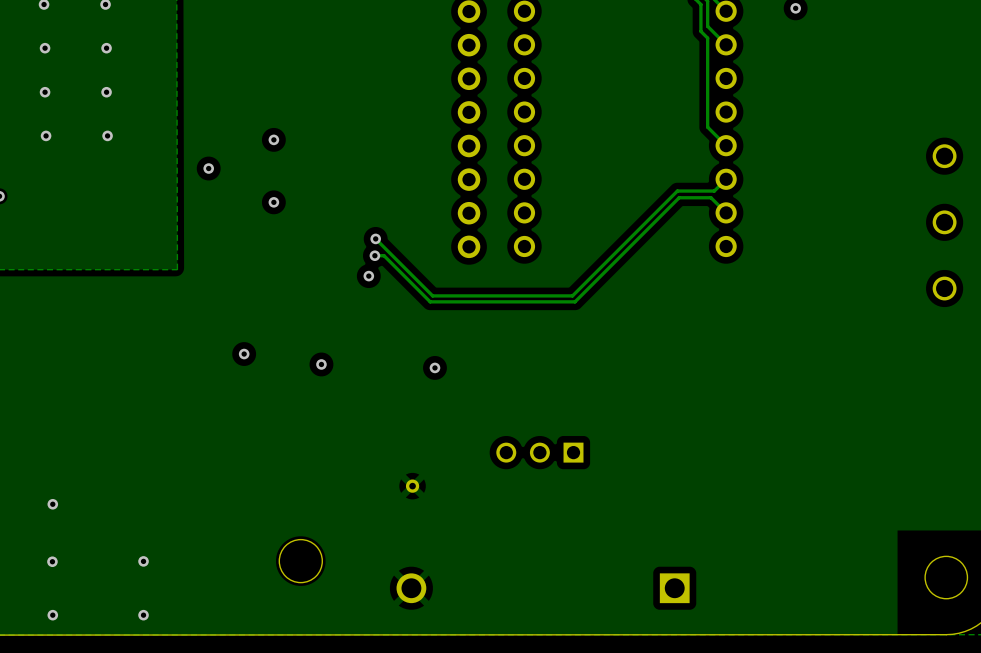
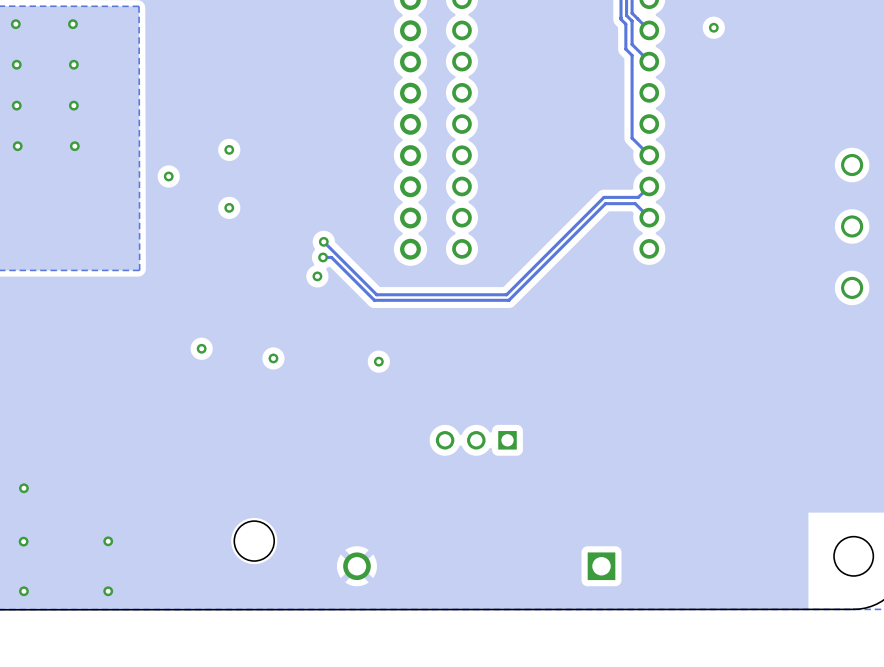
part: (412, 486) -> none

